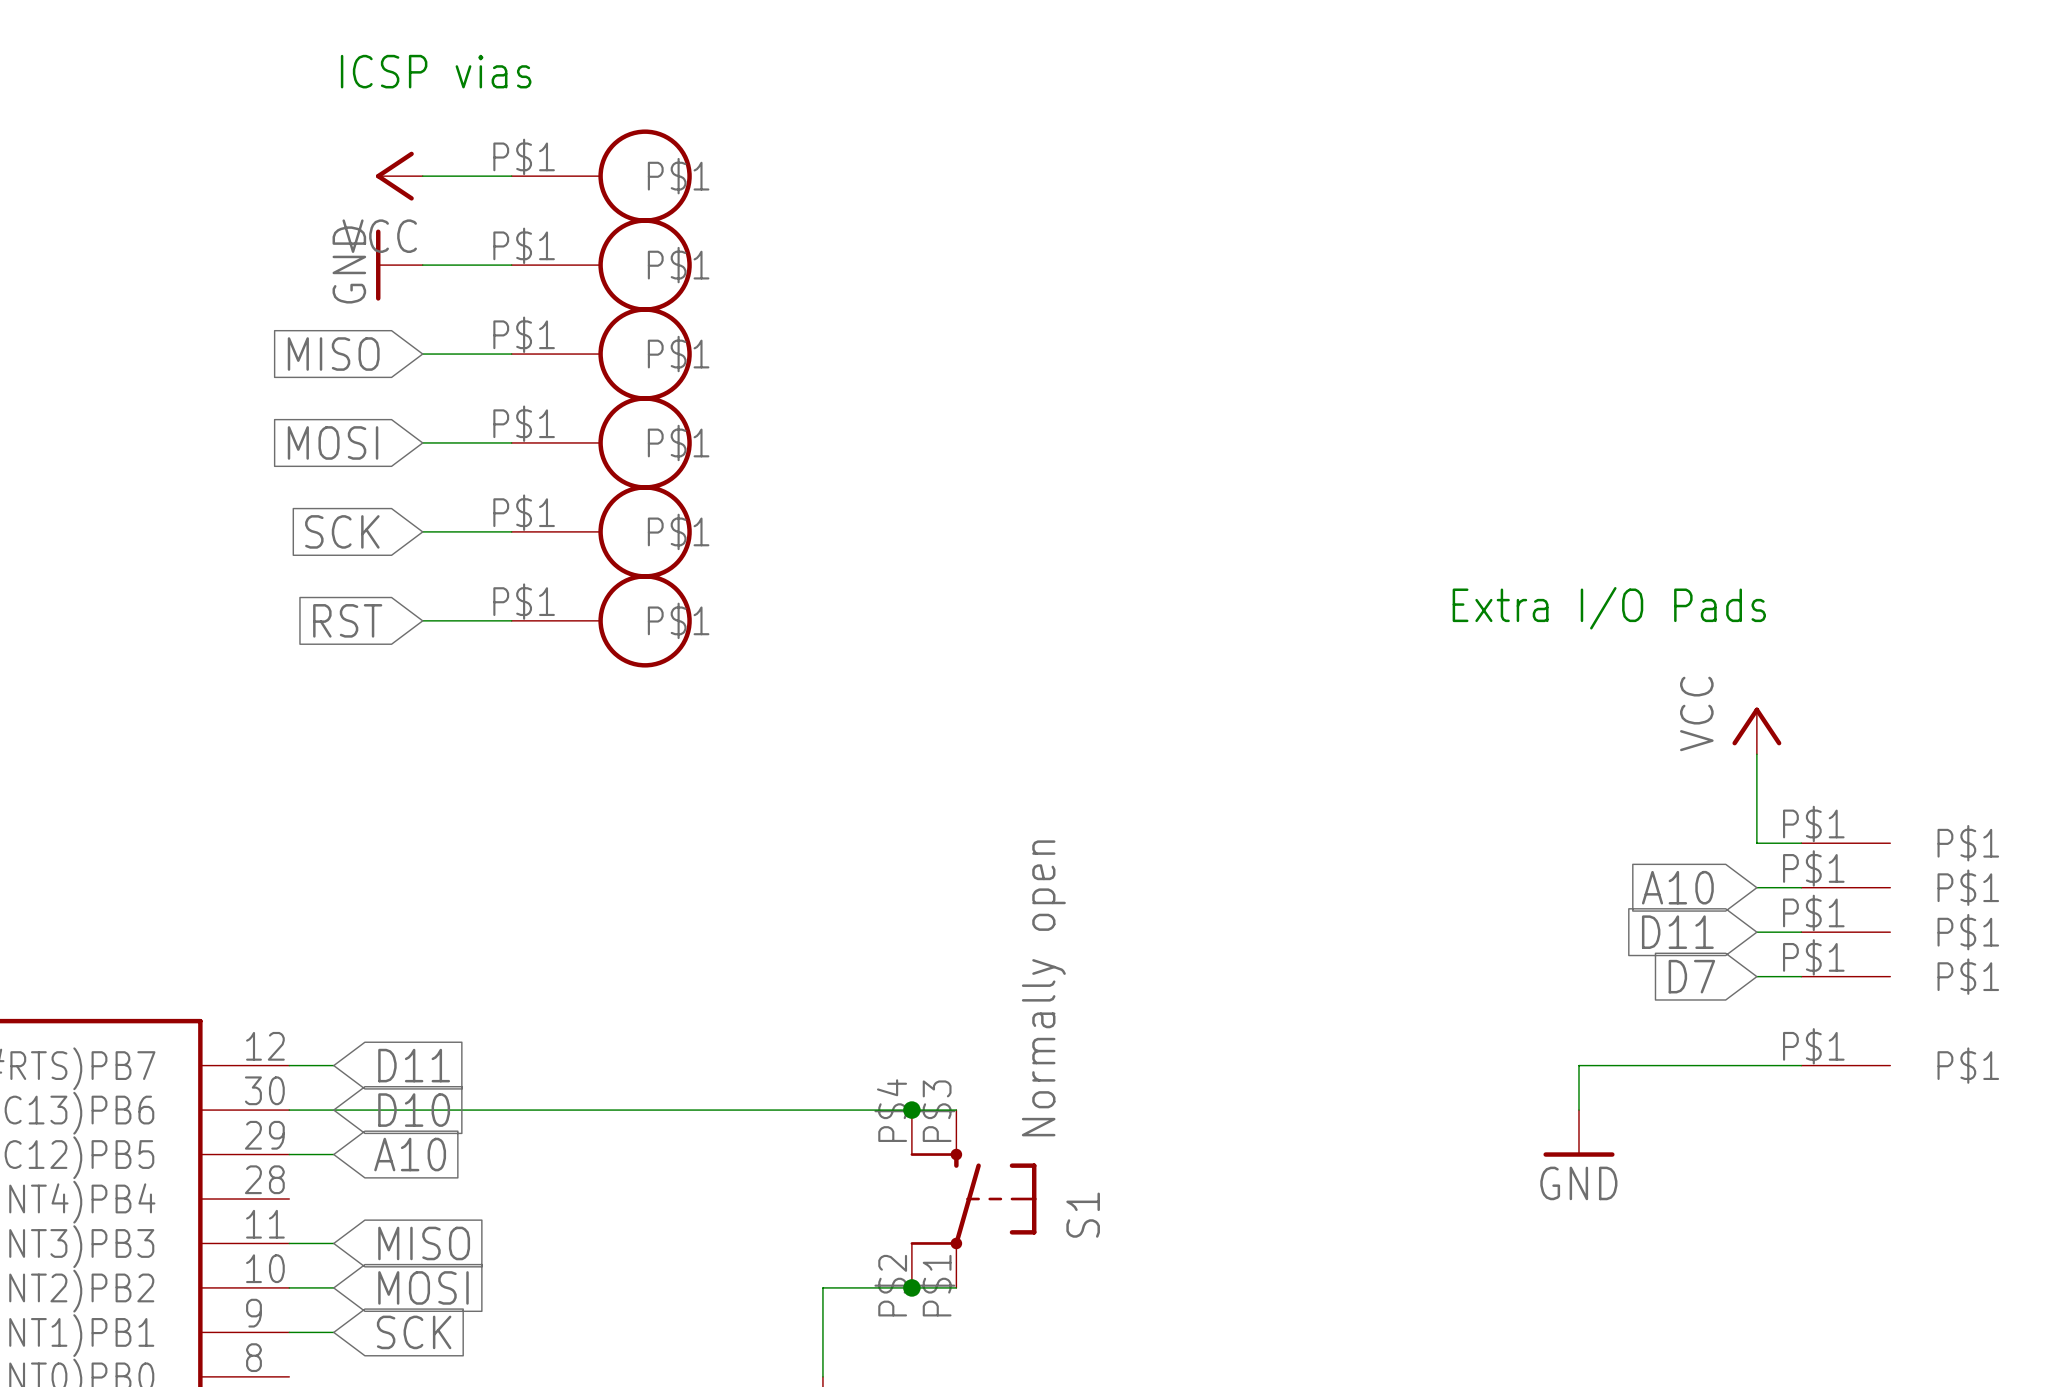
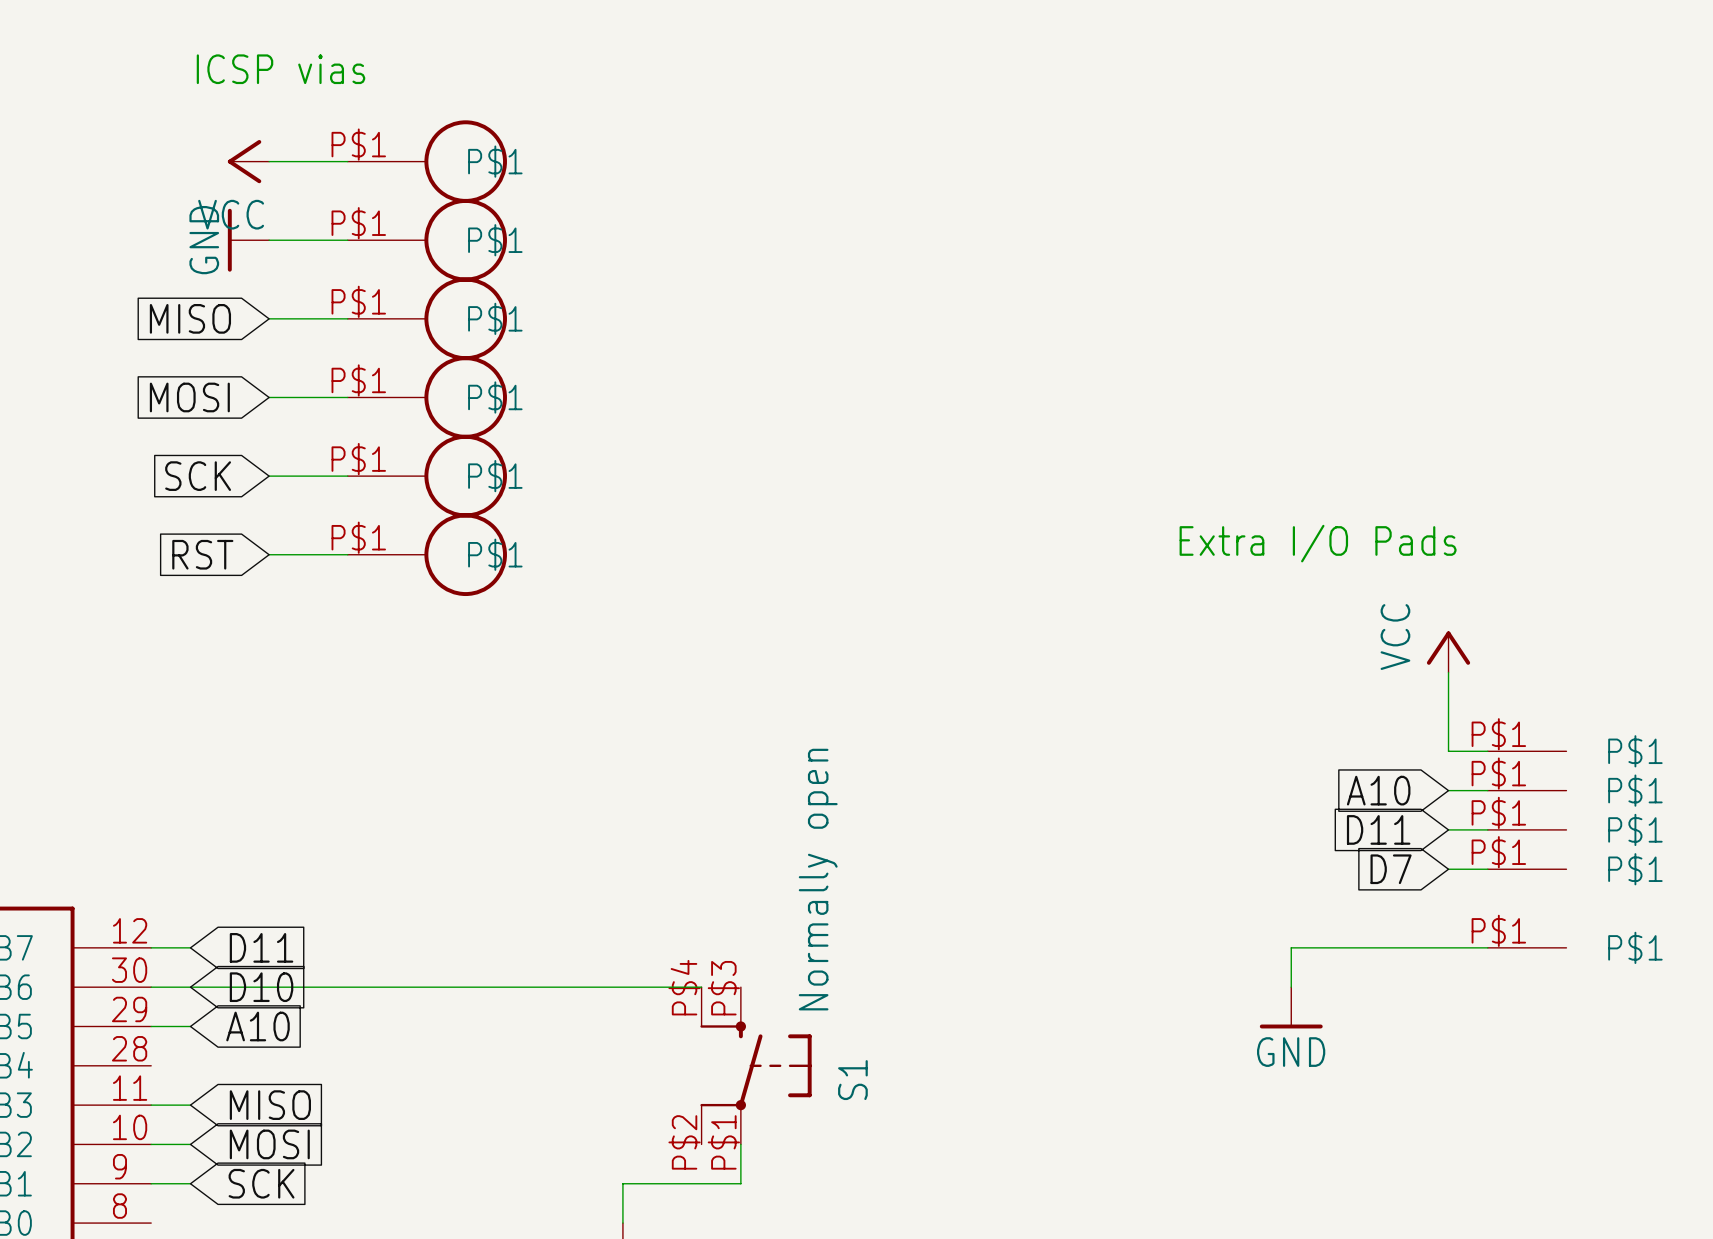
wire: (911, 1110) (956, 1110) -> none
junction: (911, 1110) -> none
junction: (911, 1287) -> none
wire: (956, 1287) (822, 1287) (822, 1332) -> (740, 1144) (740, 1183) (622, 1183)

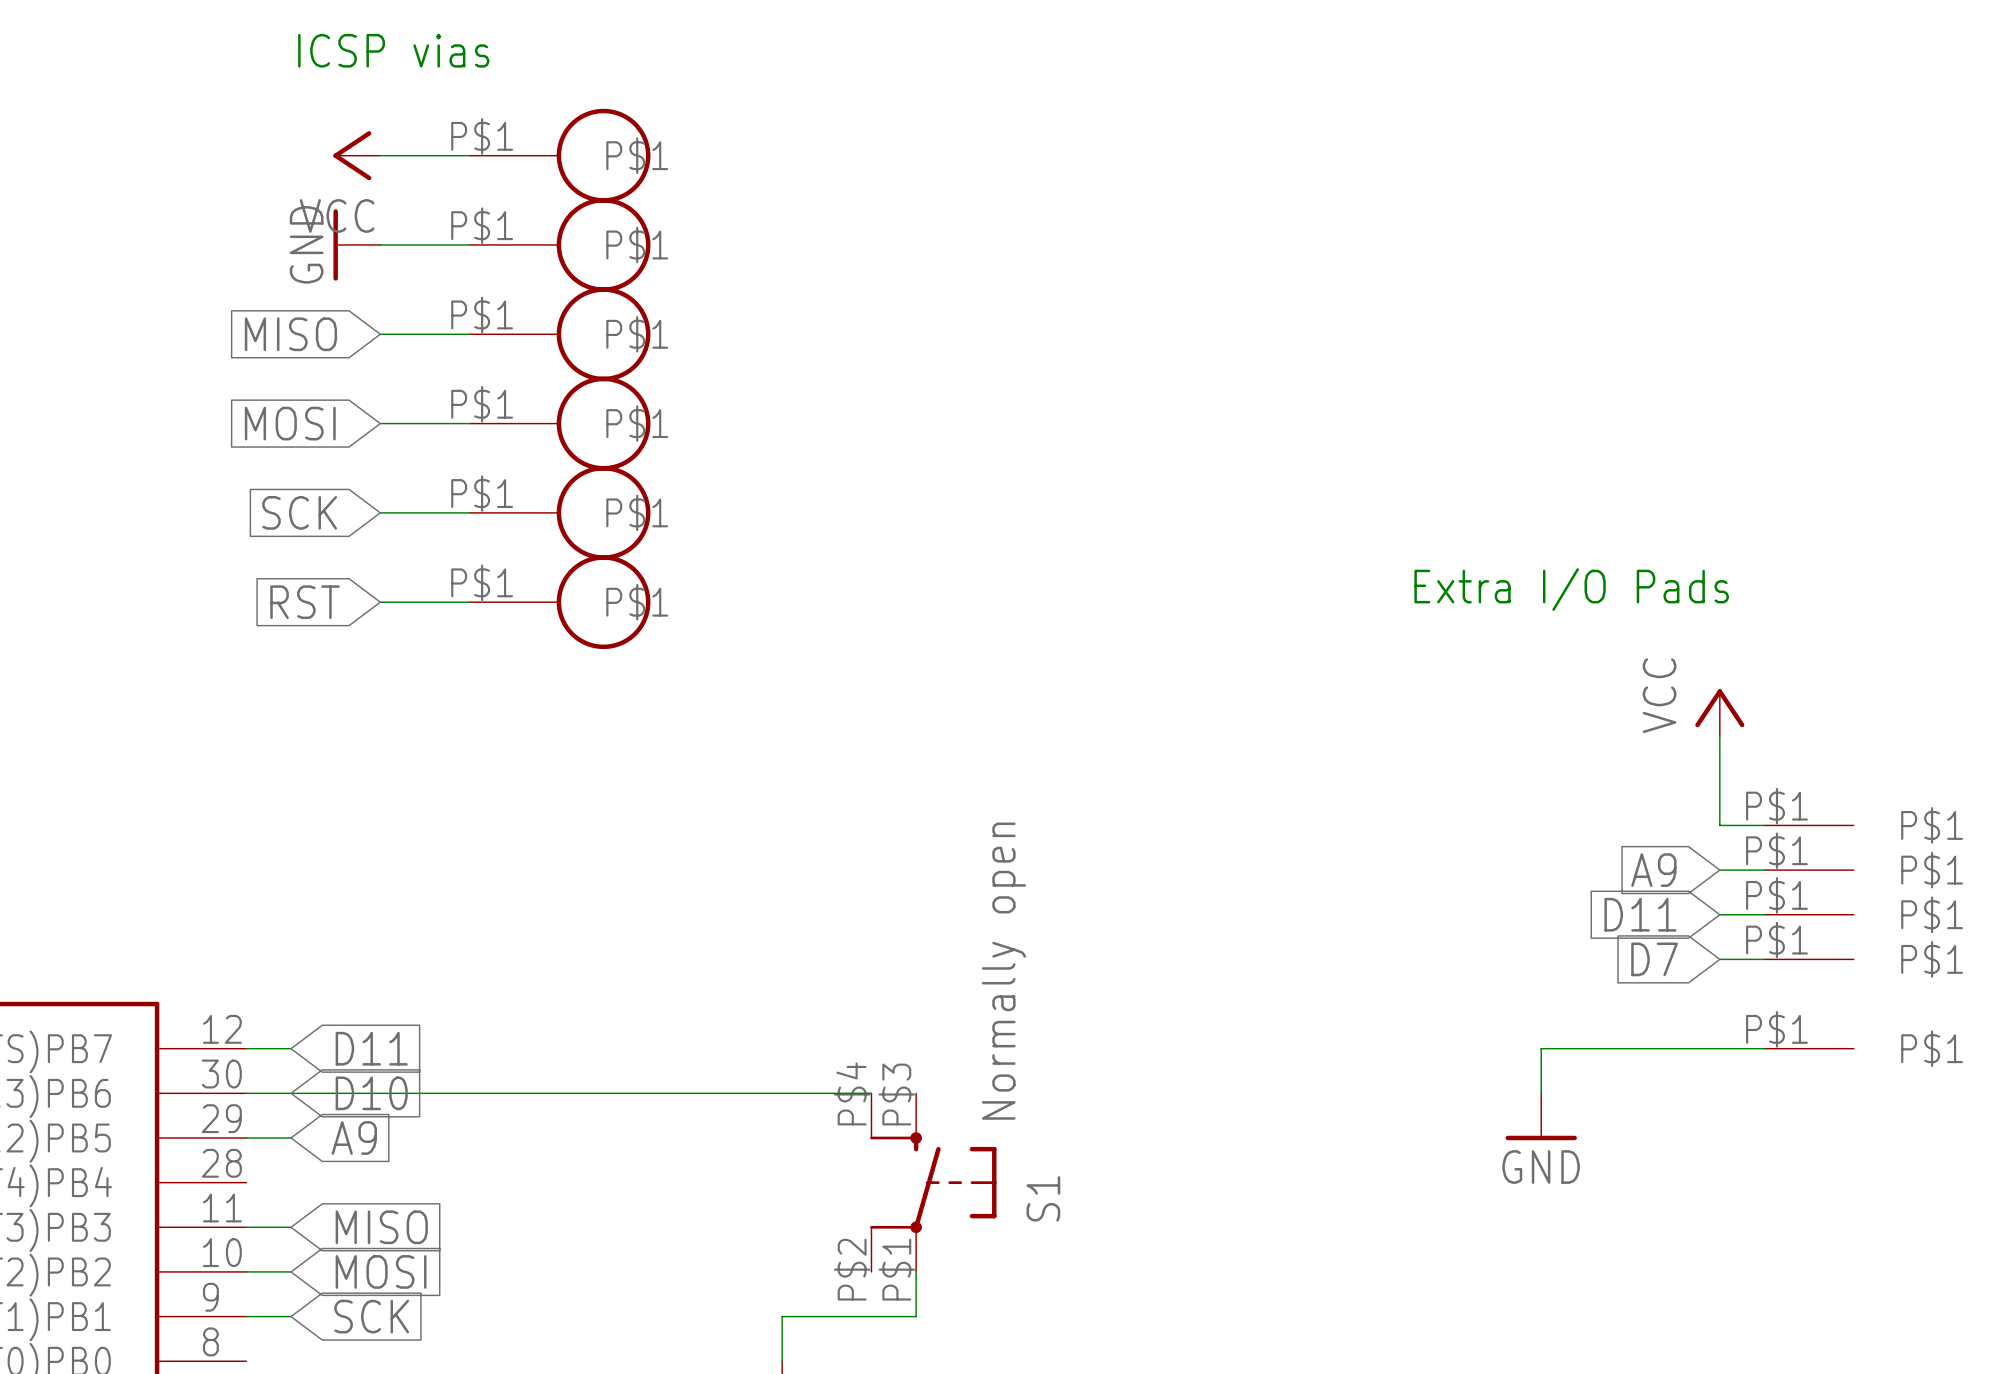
global label: A10 (1378, 790) -> A9 (1653, 870)
global label: A10 (257, 1026) -> A9 (354, 1137)

